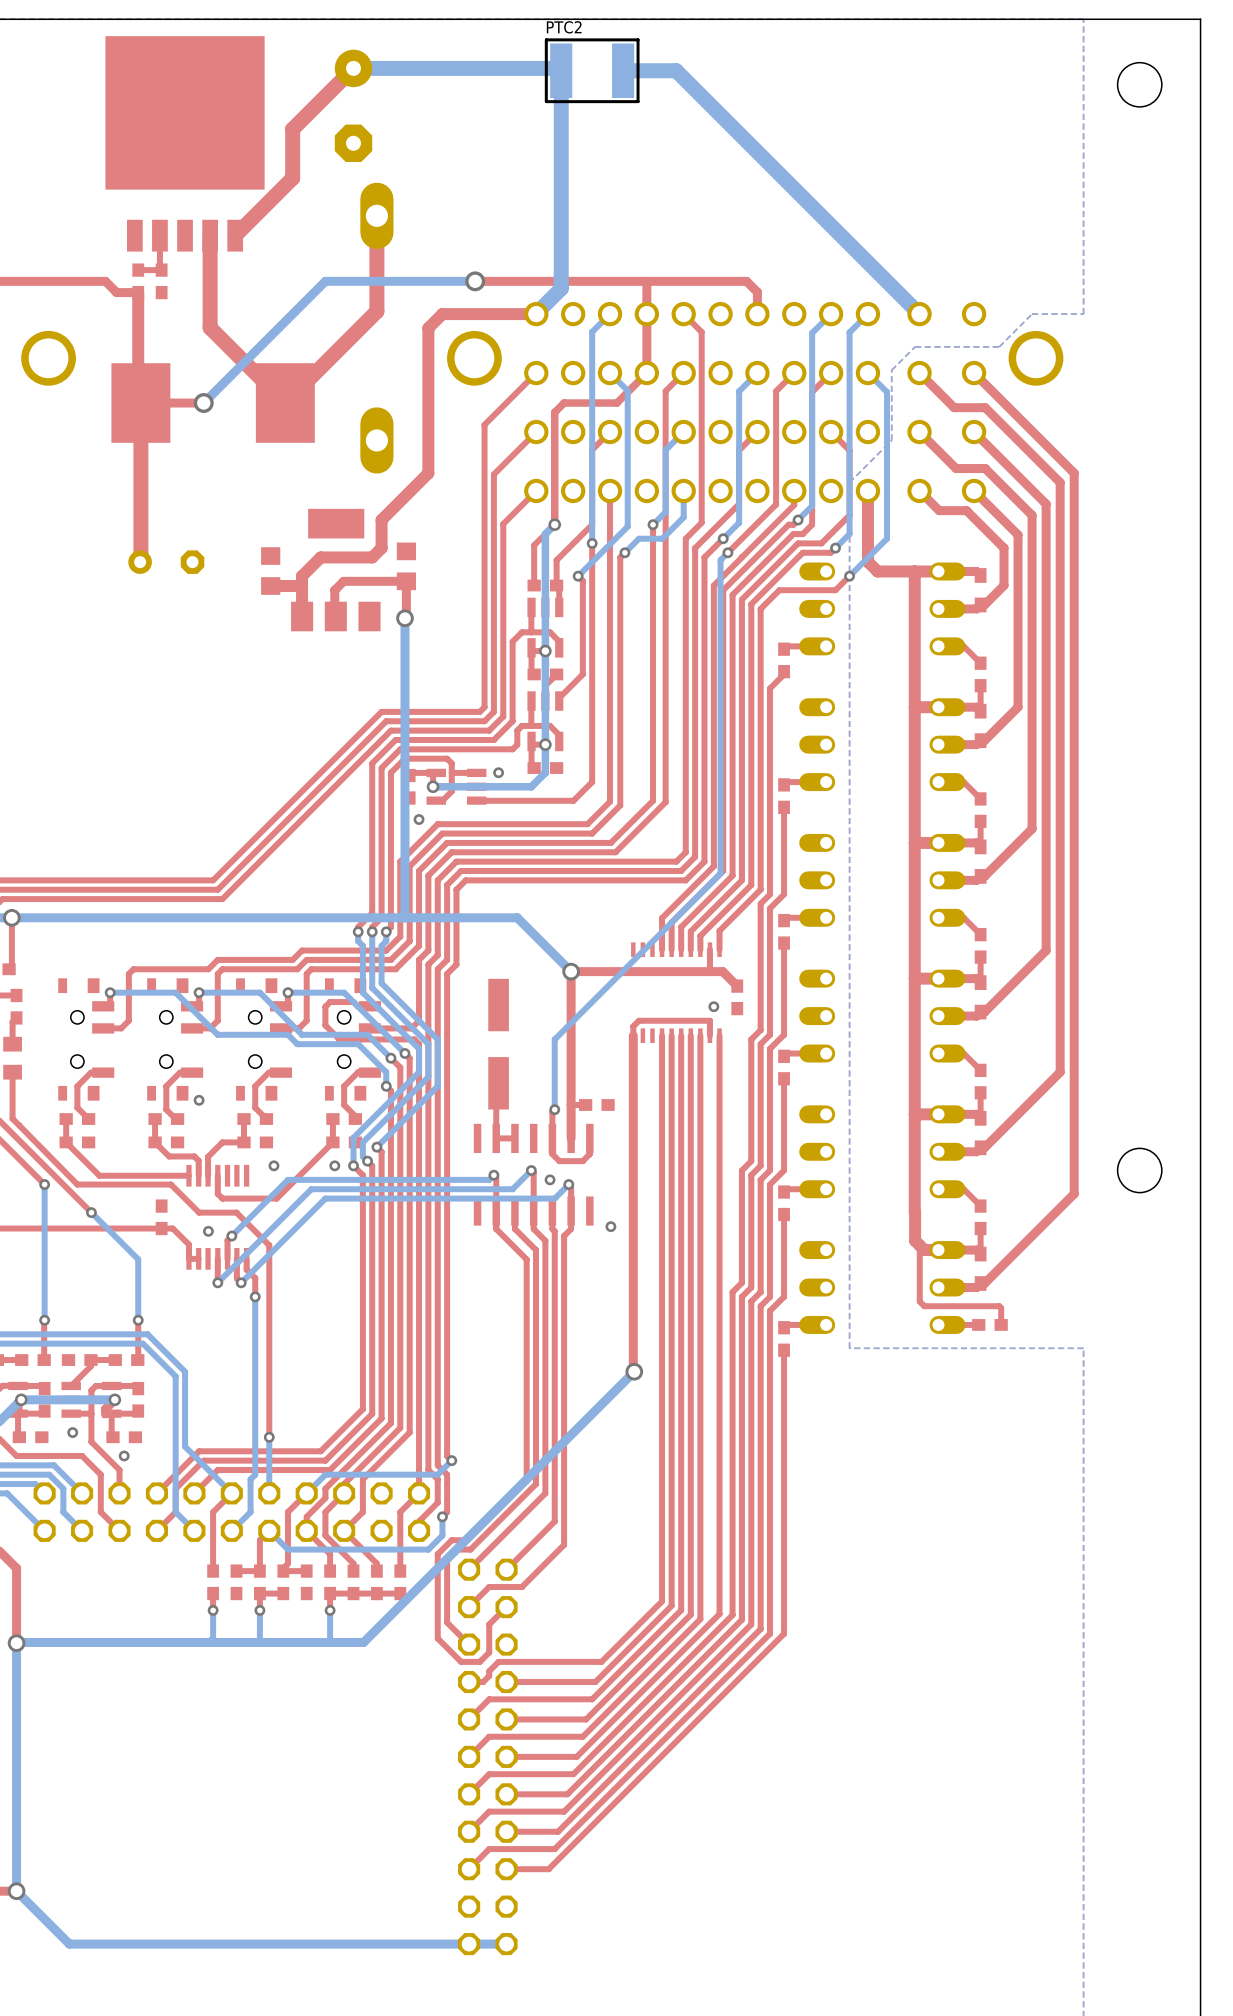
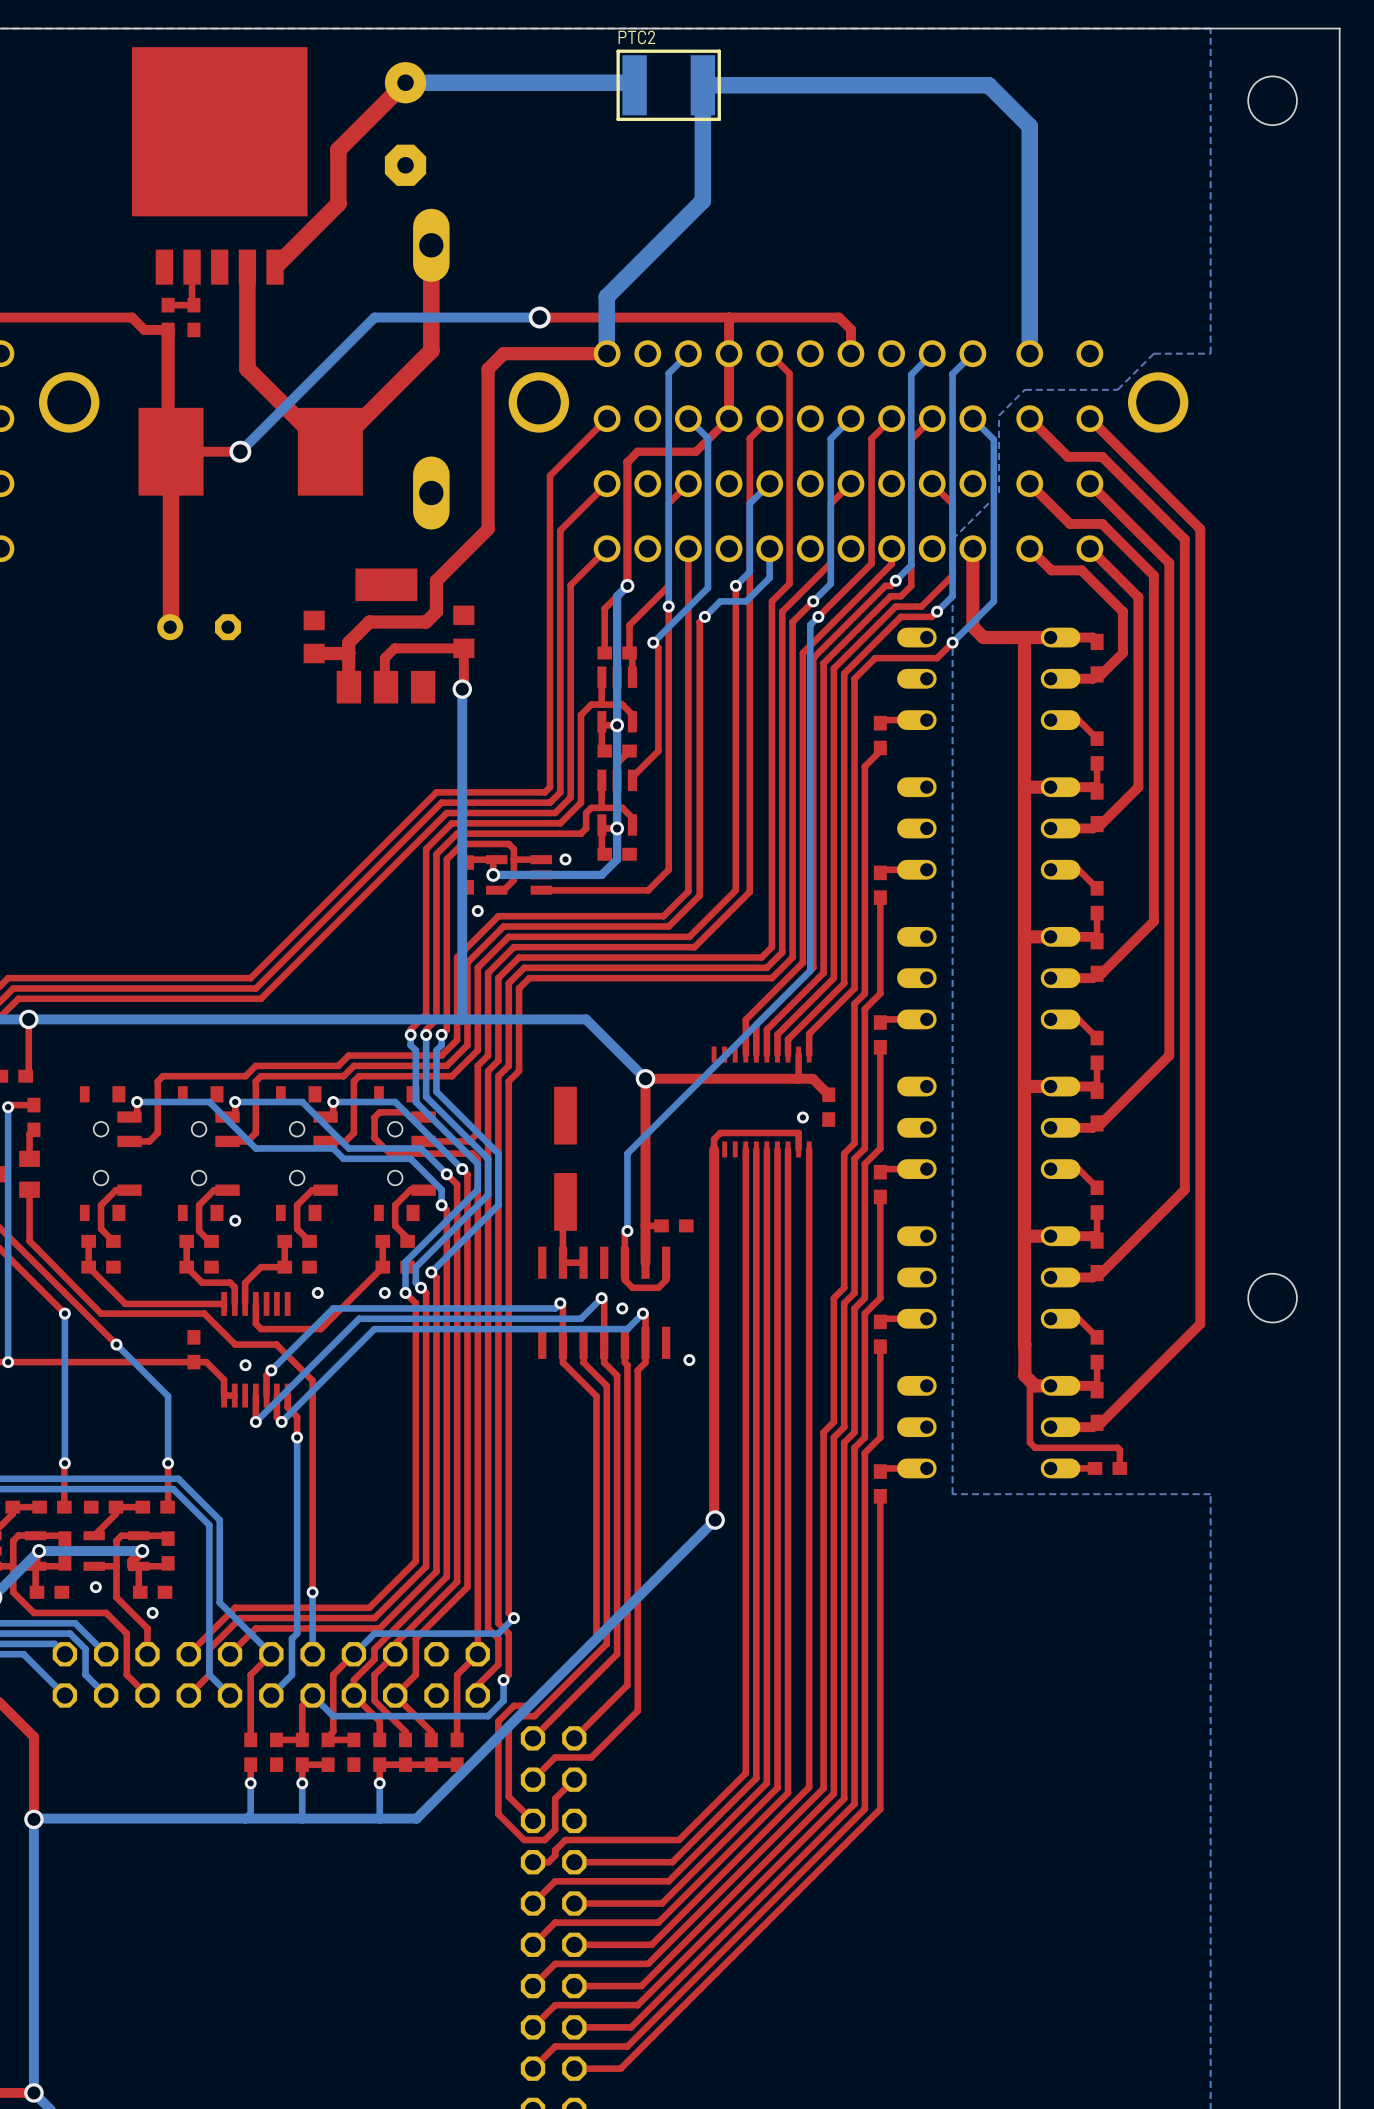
bottom track: (561, 70) (561, 288) (536, 313) -> (702, 85) (702, 200) (606, 296) (606, 353)
bottom track: (676, 70) (919, 314) -> (761, 85) (988, 85) (1029, 126) (1029, 353)

